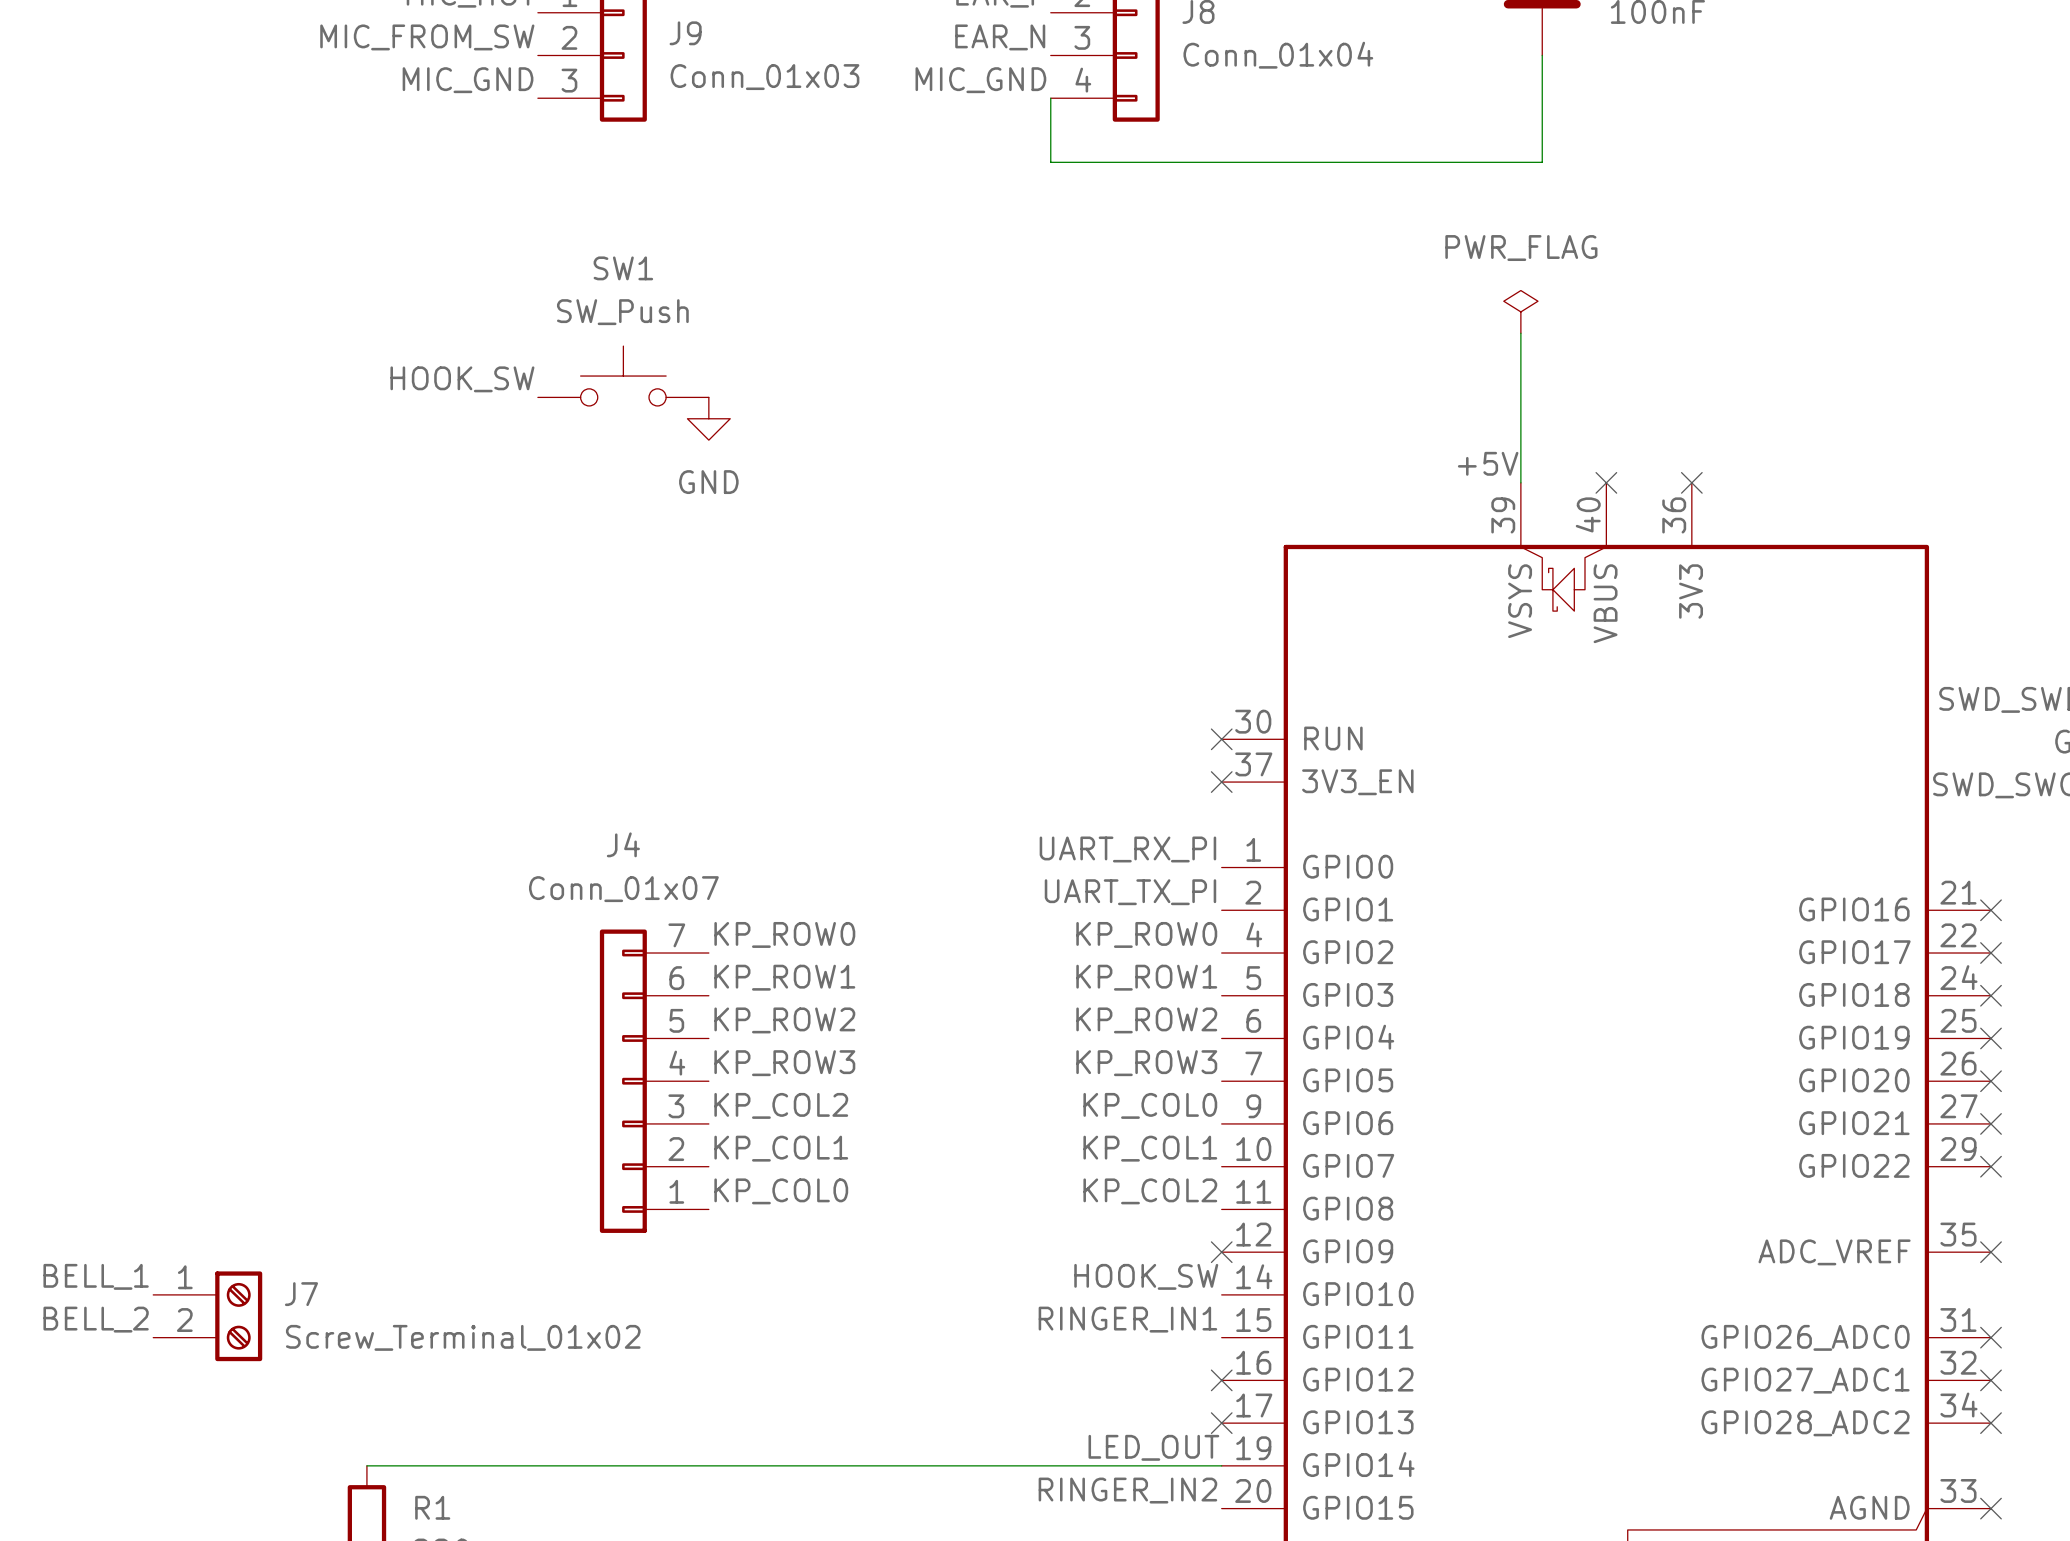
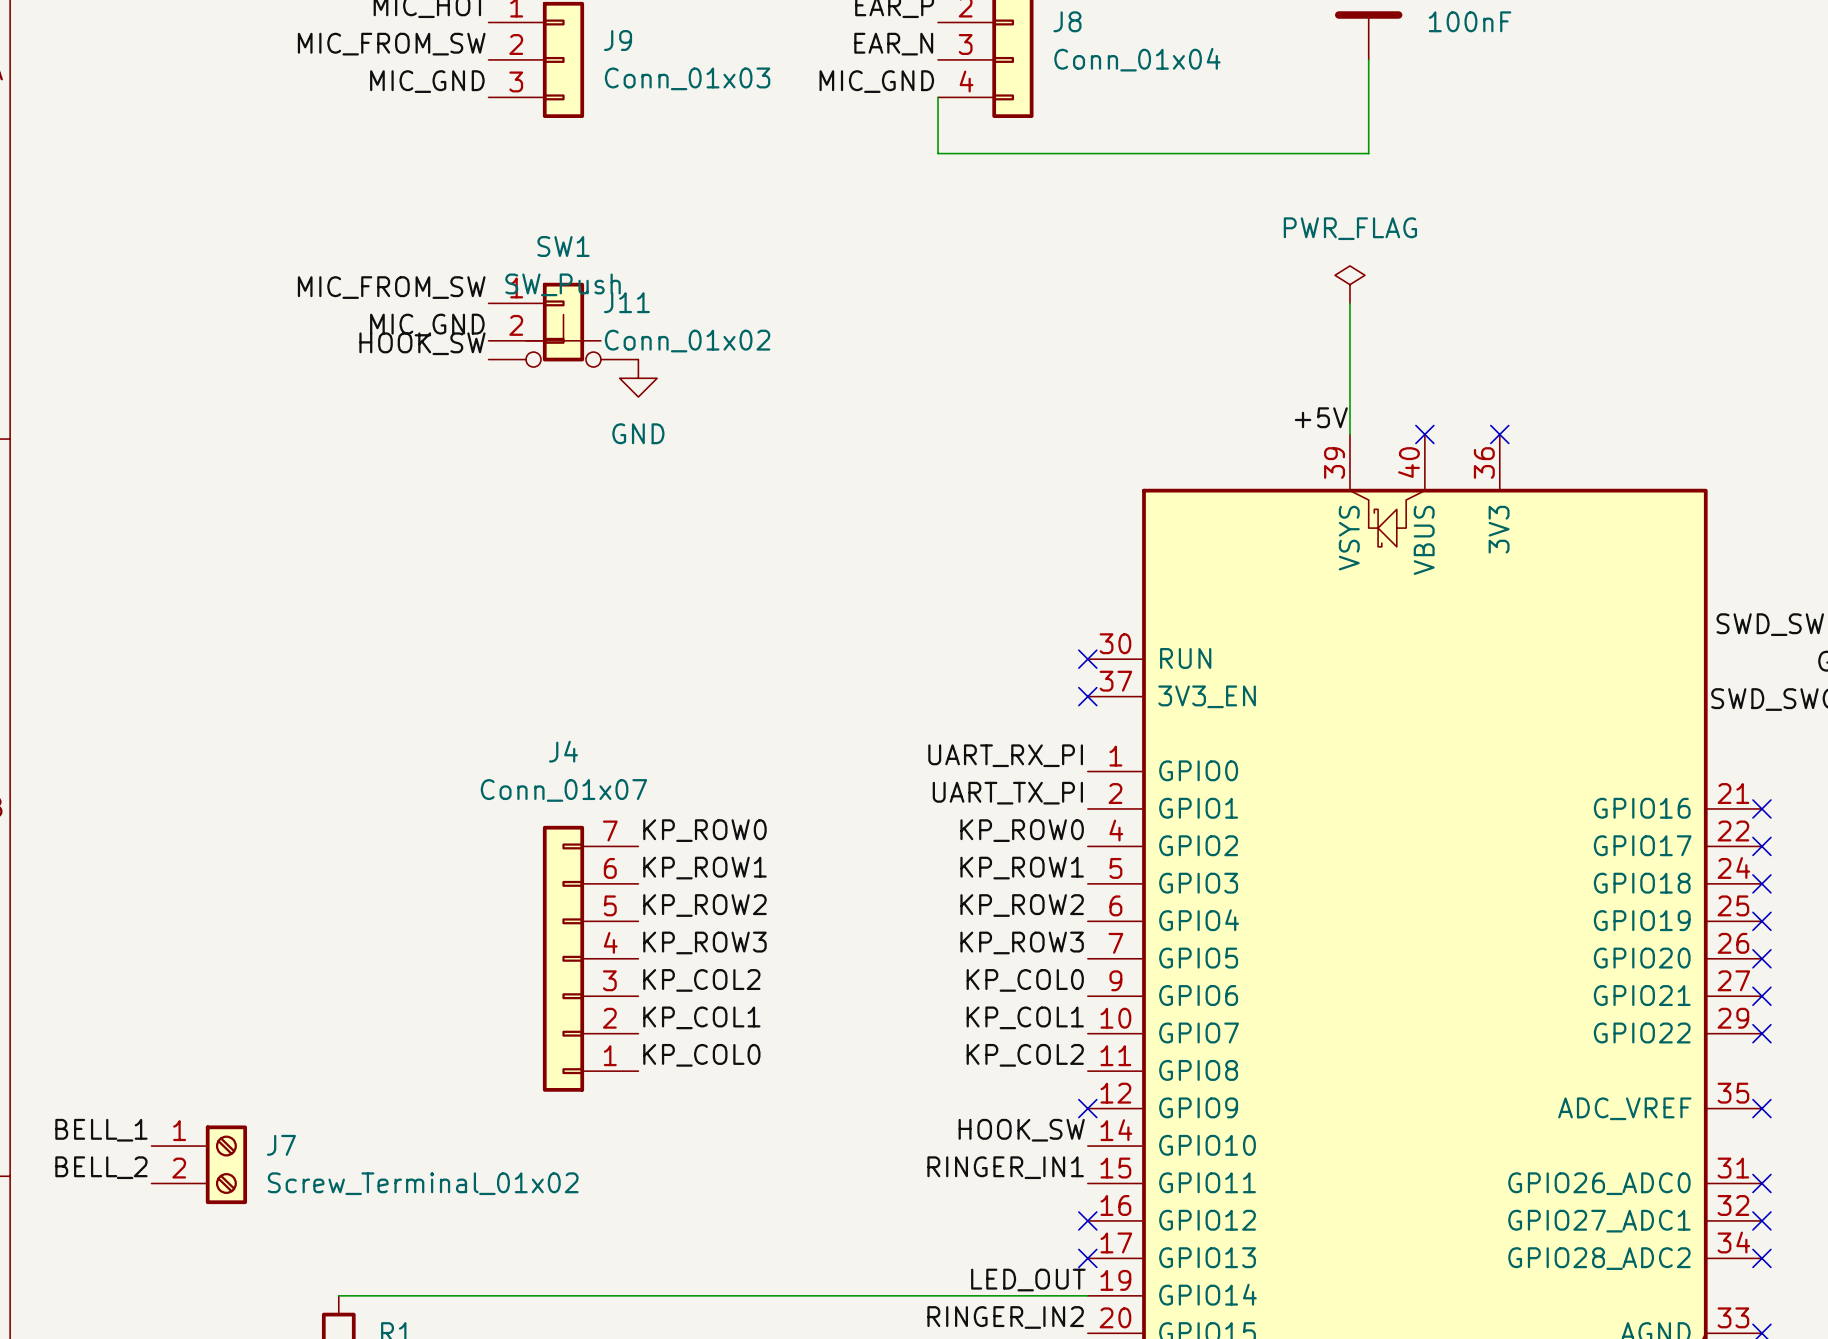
label: none -> MIC_FROM_SW (391, 287)
J11: none -> Conn_01x02 (536, 322)
label: none -> MIC_GND (427, 325)

